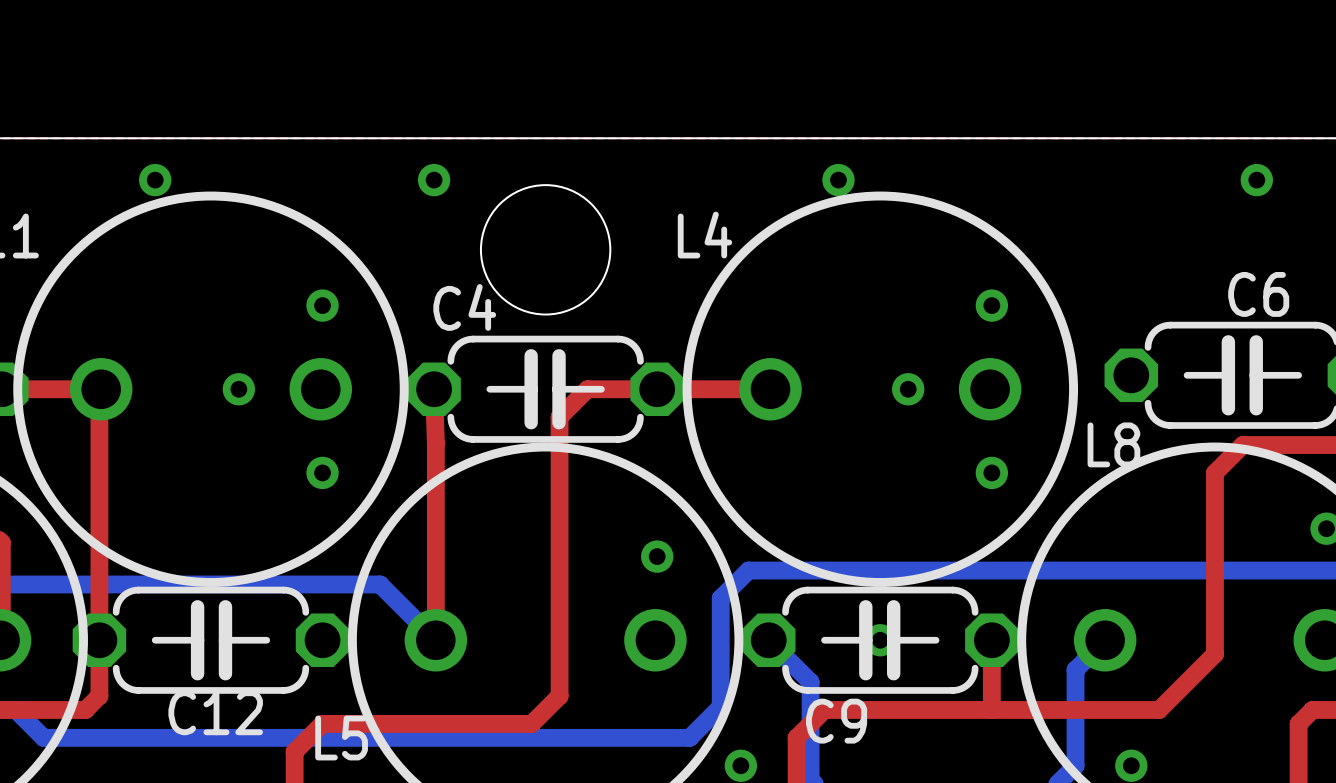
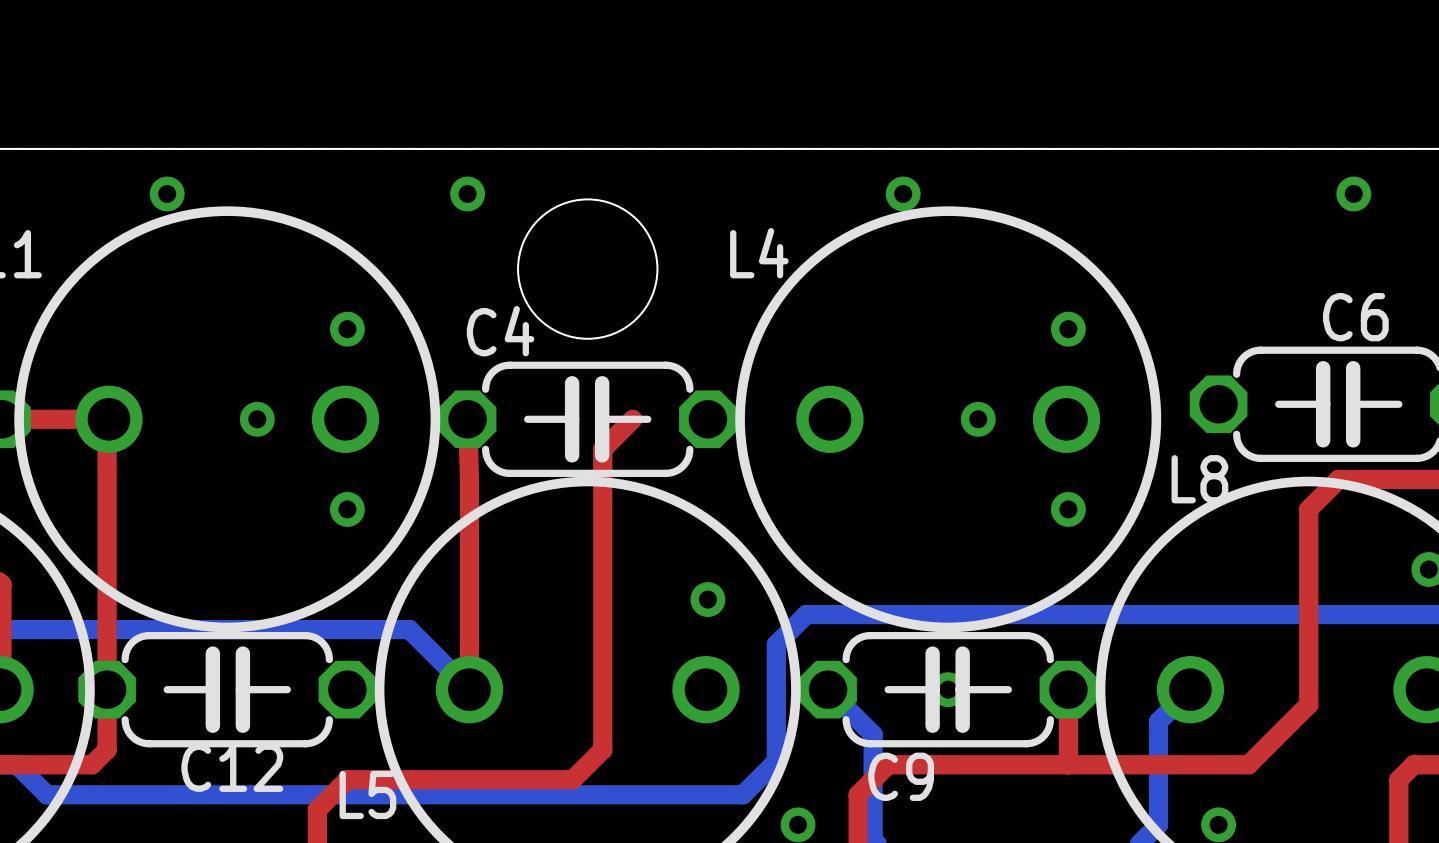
top track: (587, 389) (770, 389) -> none

